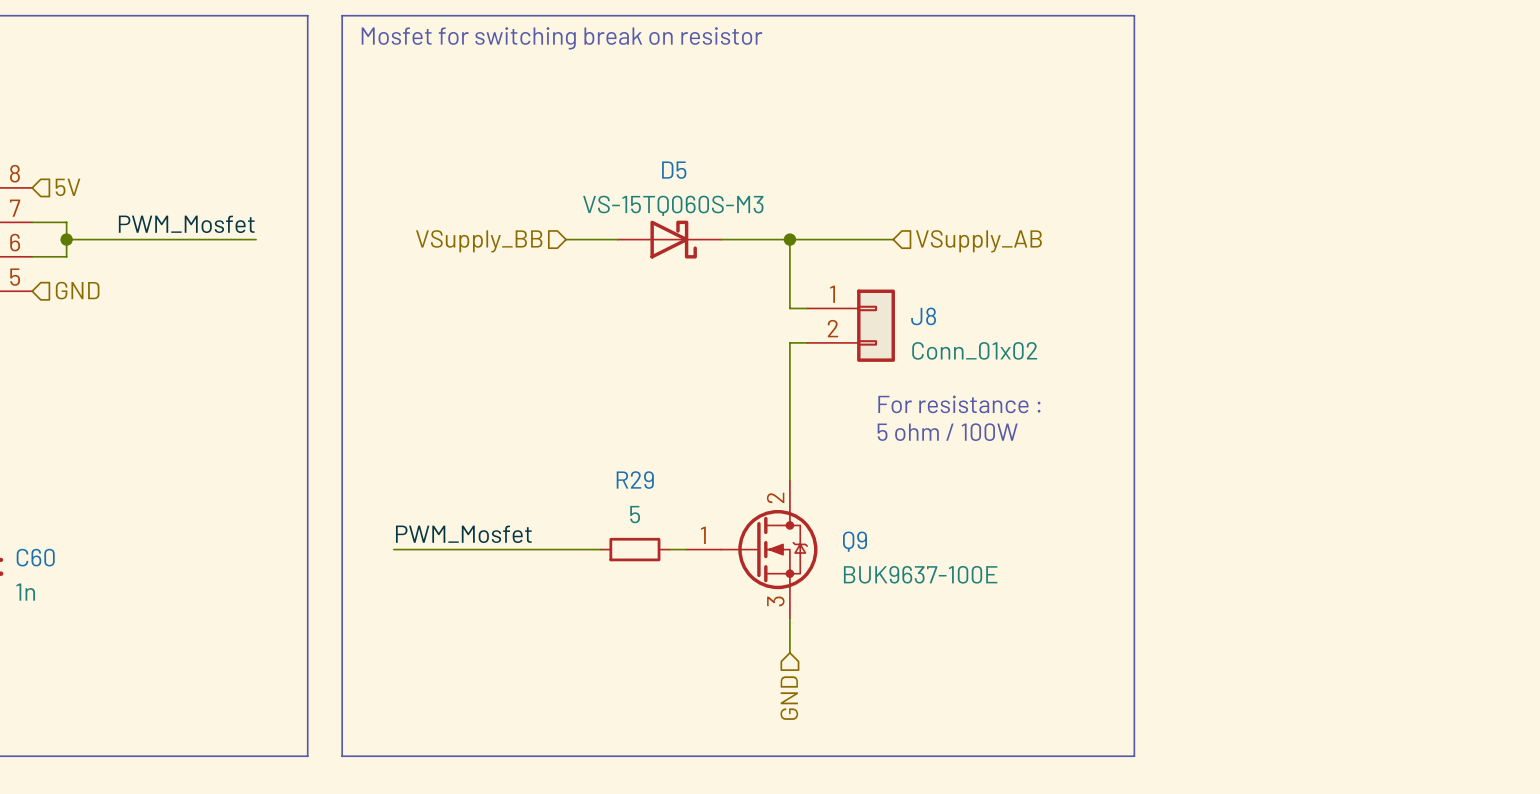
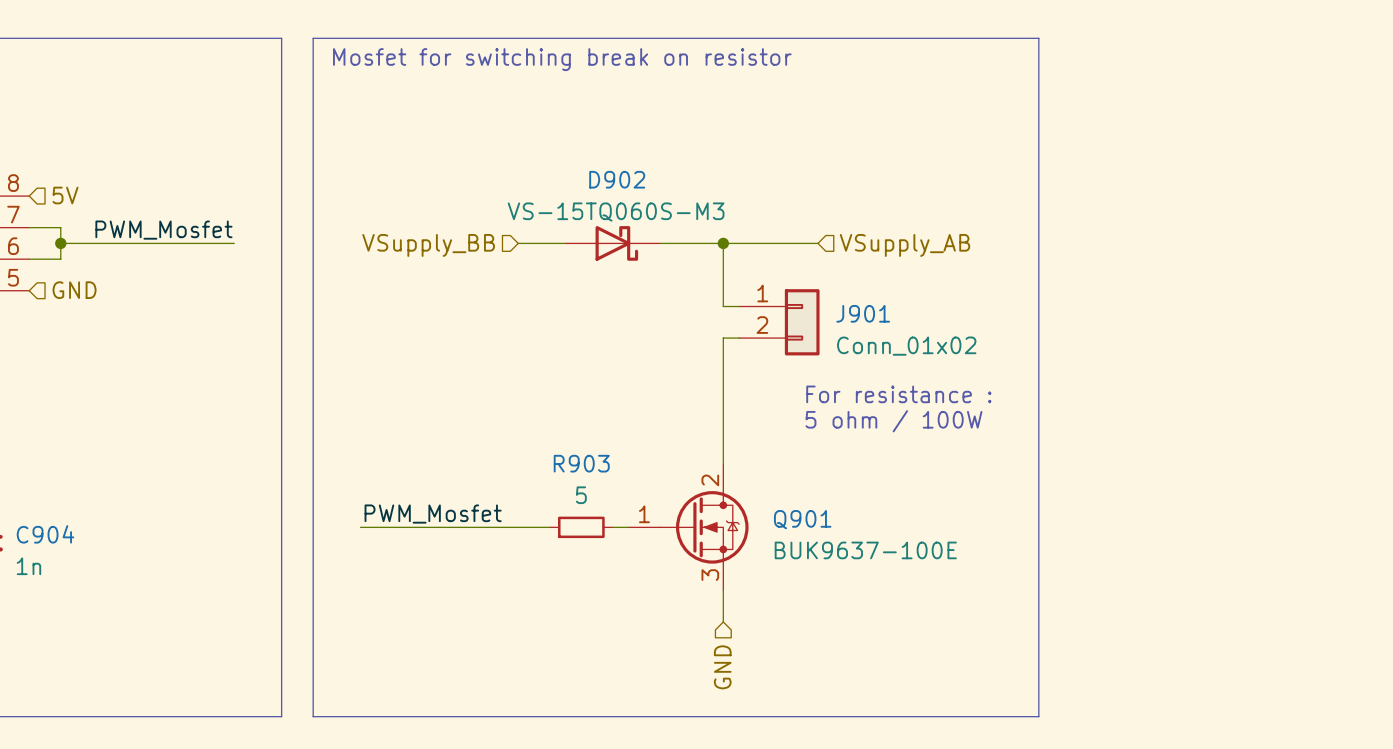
D5 name: D5 (674, 170) -> D902 (617, 179)
J8 name: J8 (923, 316) -> J901 (863, 313)
R29 name: R29 (635, 480) -> R903 (581, 463)
Q9 name: Q9 (855, 541) -> Q901 (802, 519)
C60 name: C60 (35, 557) -> C904 (45, 534)

